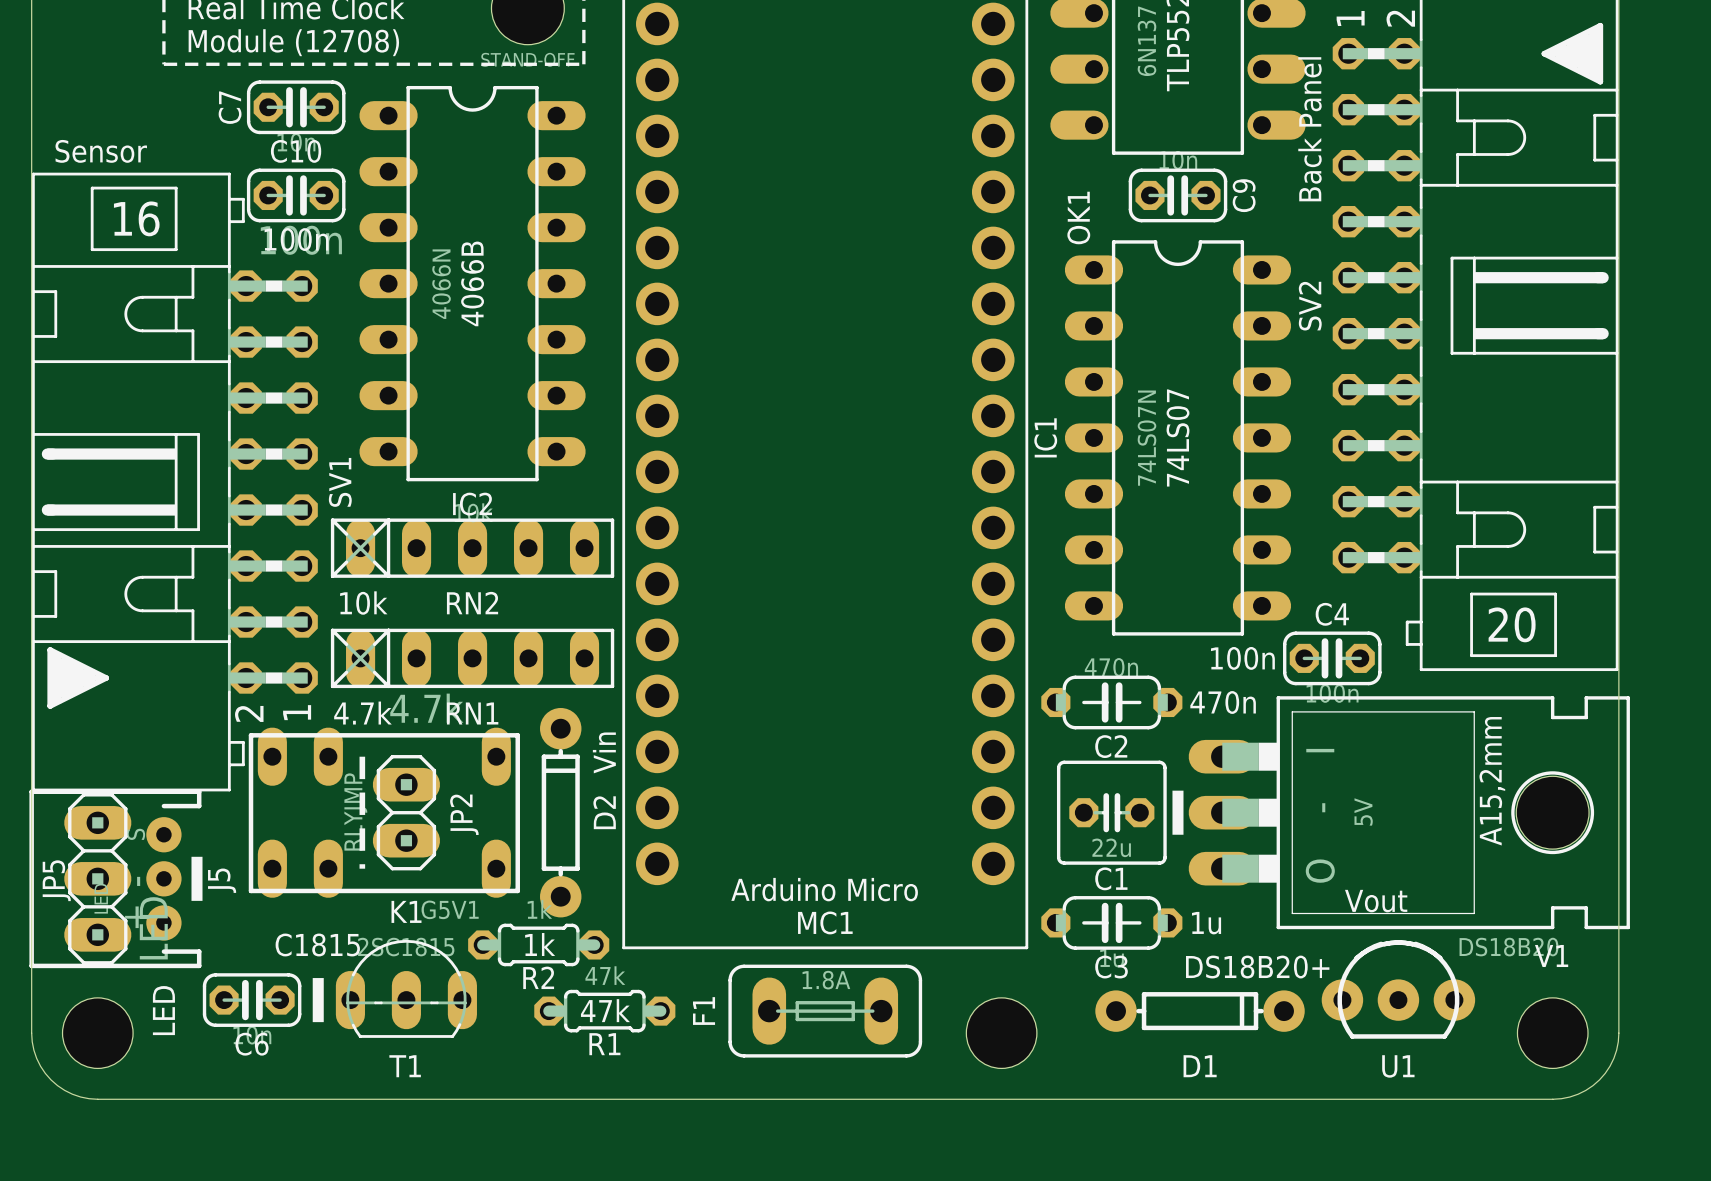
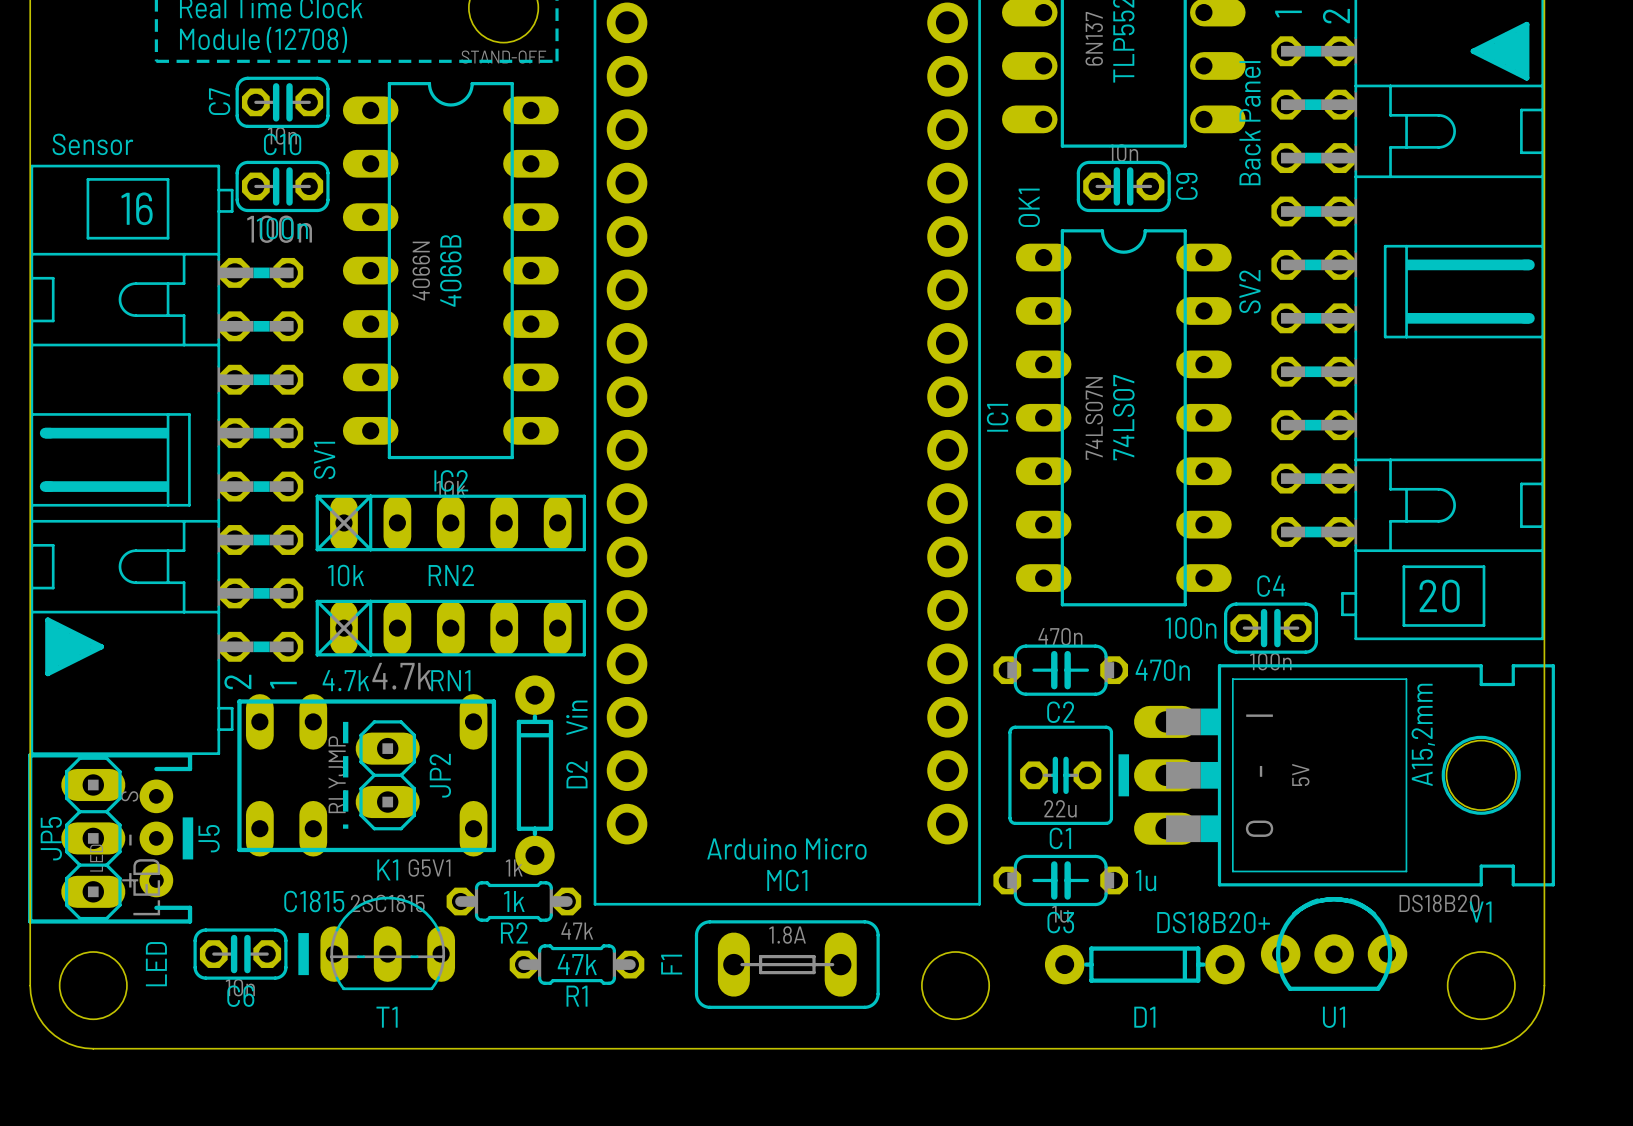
text: Vout (1376, 901) -> none

